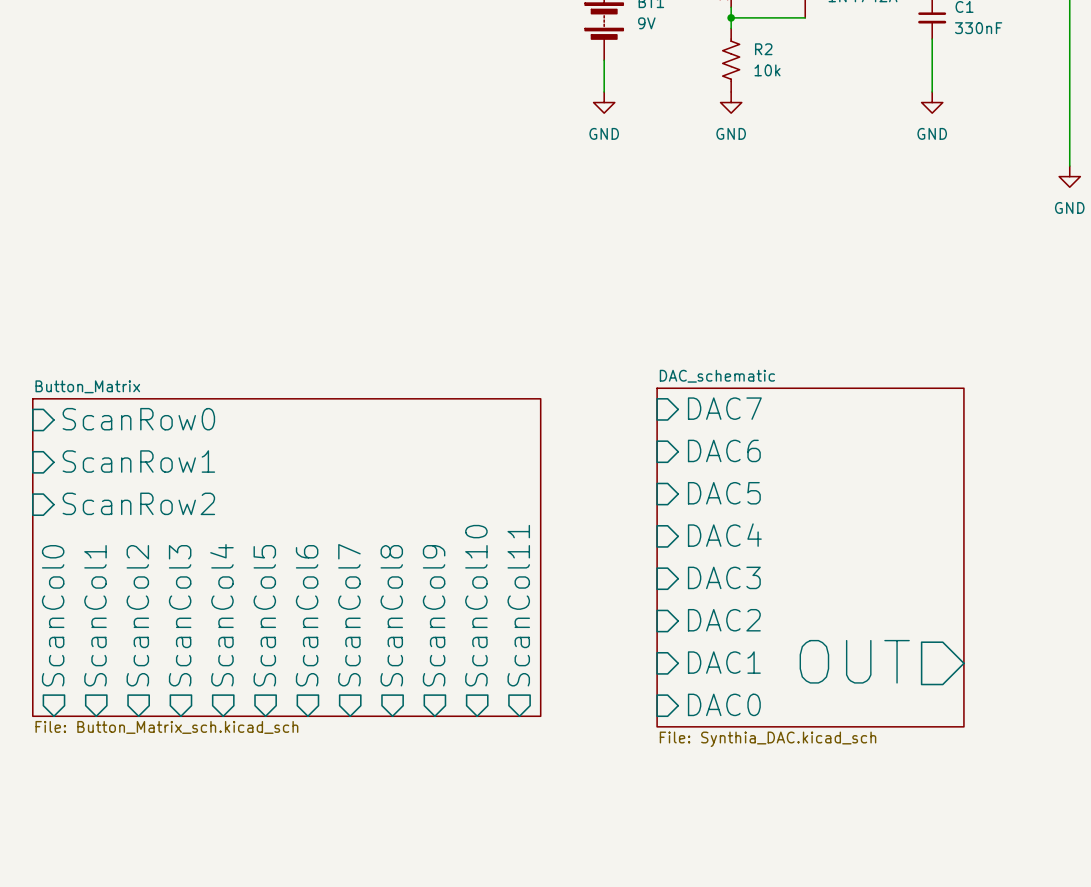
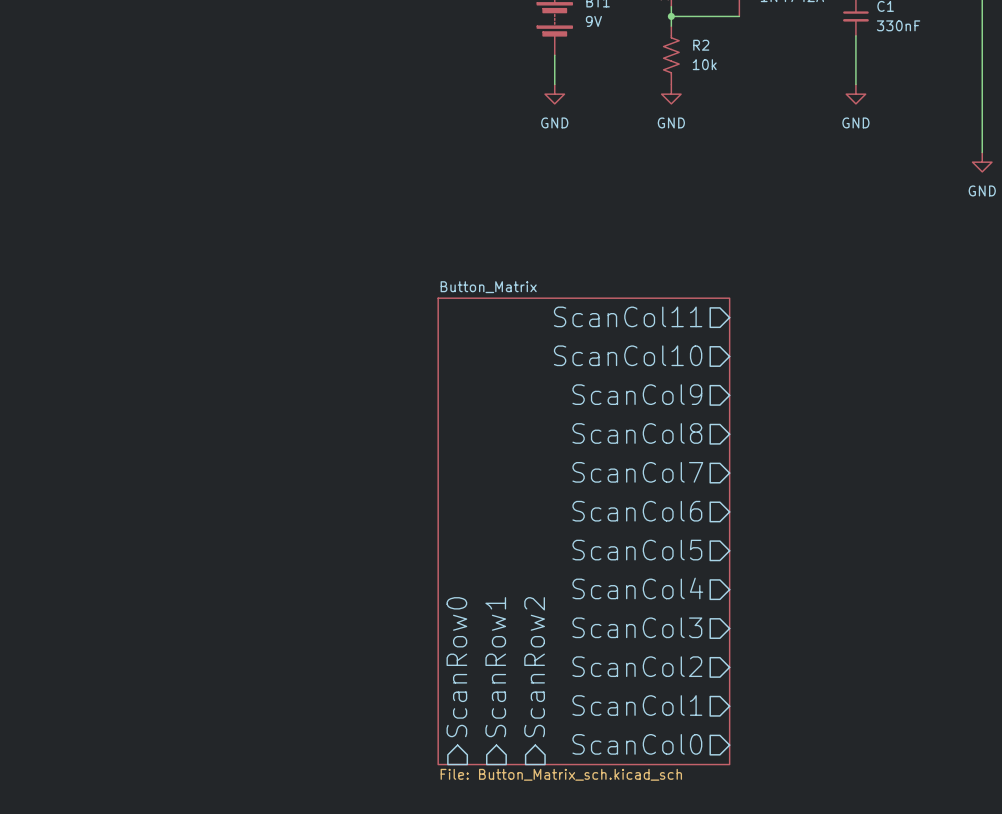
sheet pin: none -> ScanCol11 (628, 316)
sheet pin: none -> ScanCol10 (628, 355)
sheet pin: DAC7 (724, 408) -> none
sheet pin: ScanRow0 (138, 419) -> none
sheet pin: none -> ScanCol9 (637, 394)
sheet pin: DAC6 (724, 450) -> none
sheet pin: ScanRow1 (138, 461) -> none
sheet pin: none -> ScanCol8 (637, 433)
sheet pin: DAC5 (724, 493) -> none
sheet pin: ScanRow2 (138, 503) -> none
sheet pin: none -> ScanCol7 (637, 472)
sheet pin: DAC4 (724, 535) -> none
sheet pin: none -> ScanCol6 (637, 511)
sheet Button_Matrix: File: Button_Matrix_sch.kicad_sch (286, 557) -> none
sheet DAC_schematic: File: Synthia_DAC.kicad_sch (810, 557) -> none
sheet pin: DAC3 (724, 577) -> none
sheet Button_Matrix: none -> File: Button_Matrix_sch.kicad_sch (583, 531)
sheet pin: none -> ScanCol5 (637, 550)
sheet pin shape: output (476, 605) -> input (456, 667)
sheet pin: ScanCol10 (476, 605) -> ScanRow0 (456, 667)
sheet pin shape: output (518, 605) -> input (495, 667)
sheet pin: ScanCol11 (518, 605) -> ScanRow1 (495, 667)
sheet pin: ScanCol0 (53, 615) -> none
sheet pin: ScanCol1 (95, 615) -> none
sheet pin: ScanCol2 (137, 615) -> none
sheet pin: ScanCol3 (180, 615) -> none
sheet pin: ScanCol4 (221, 615) -> none
sheet pin: ScanCol5 (264, 615) -> none
sheet pin: ScanCol6 (307, 615) -> none
sheet pin: ScanCol7 (349, 615) -> none
sheet pin: ScanCol8 (391, 615) -> none
sheet pin: ScanCol9 (434, 615) -> none
sheet pin: DAC2 (724, 620) -> none
sheet pin: none -> ScanCol4 (637, 588)
sheet pin: OUT (854, 661) -> none
sheet pin: DAC1 (724, 662) -> none
sheet pin: none -> ScanCol3 (637, 627)
sheet pin: DAC0 (724, 704) -> none
sheet pin: none -> ScanRow2 (534, 667)
sheet pin: none -> ScanCol2 (637, 666)
sheet pin: none -> ScanCol1 (637, 705)
sheet pin: none -> ScanCol0 (637, 744)

